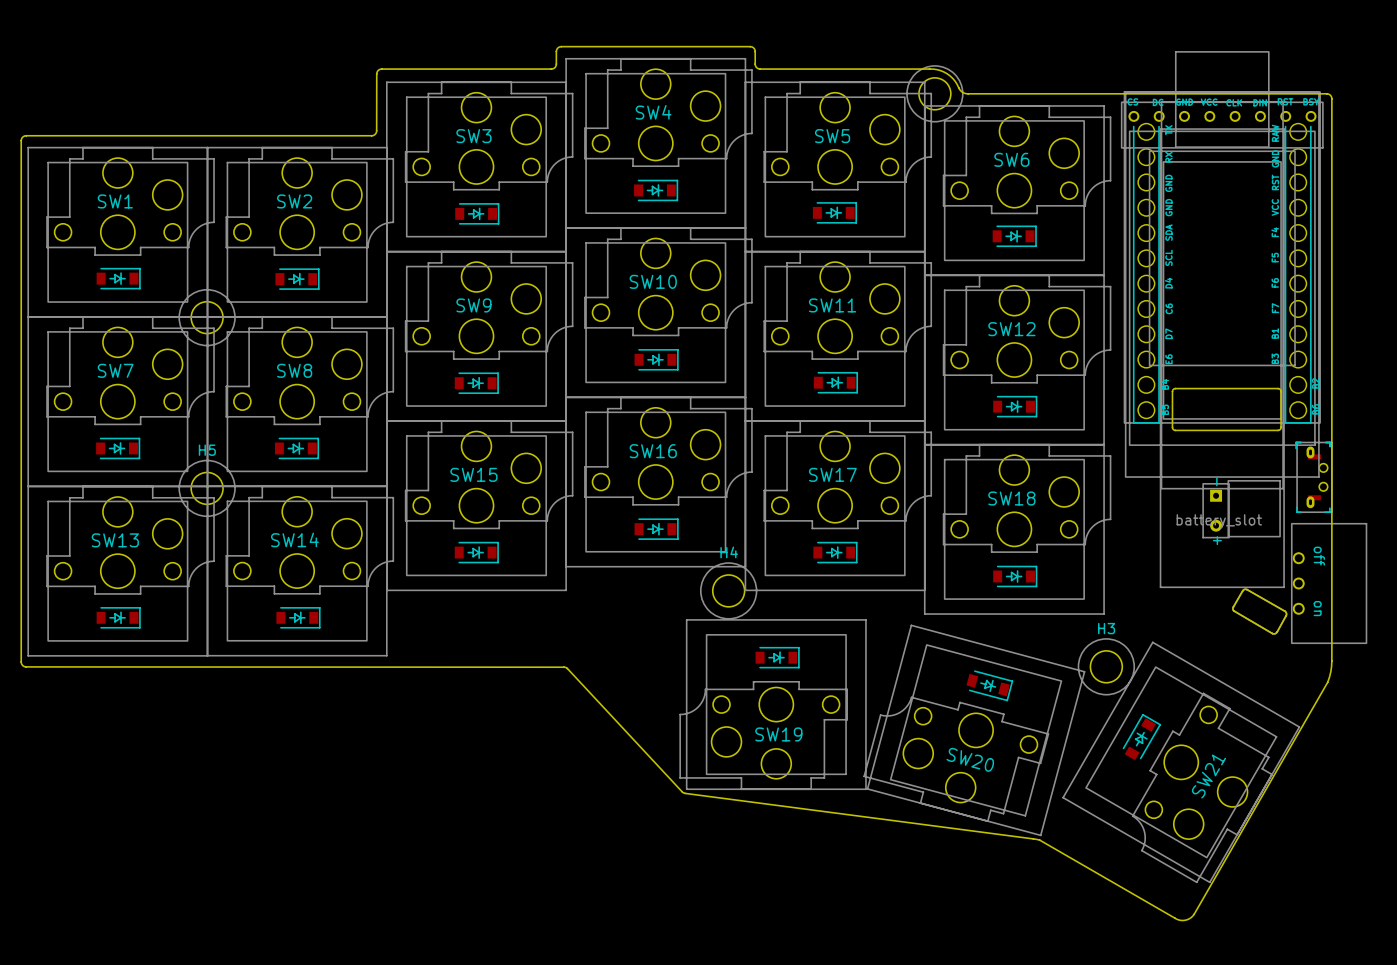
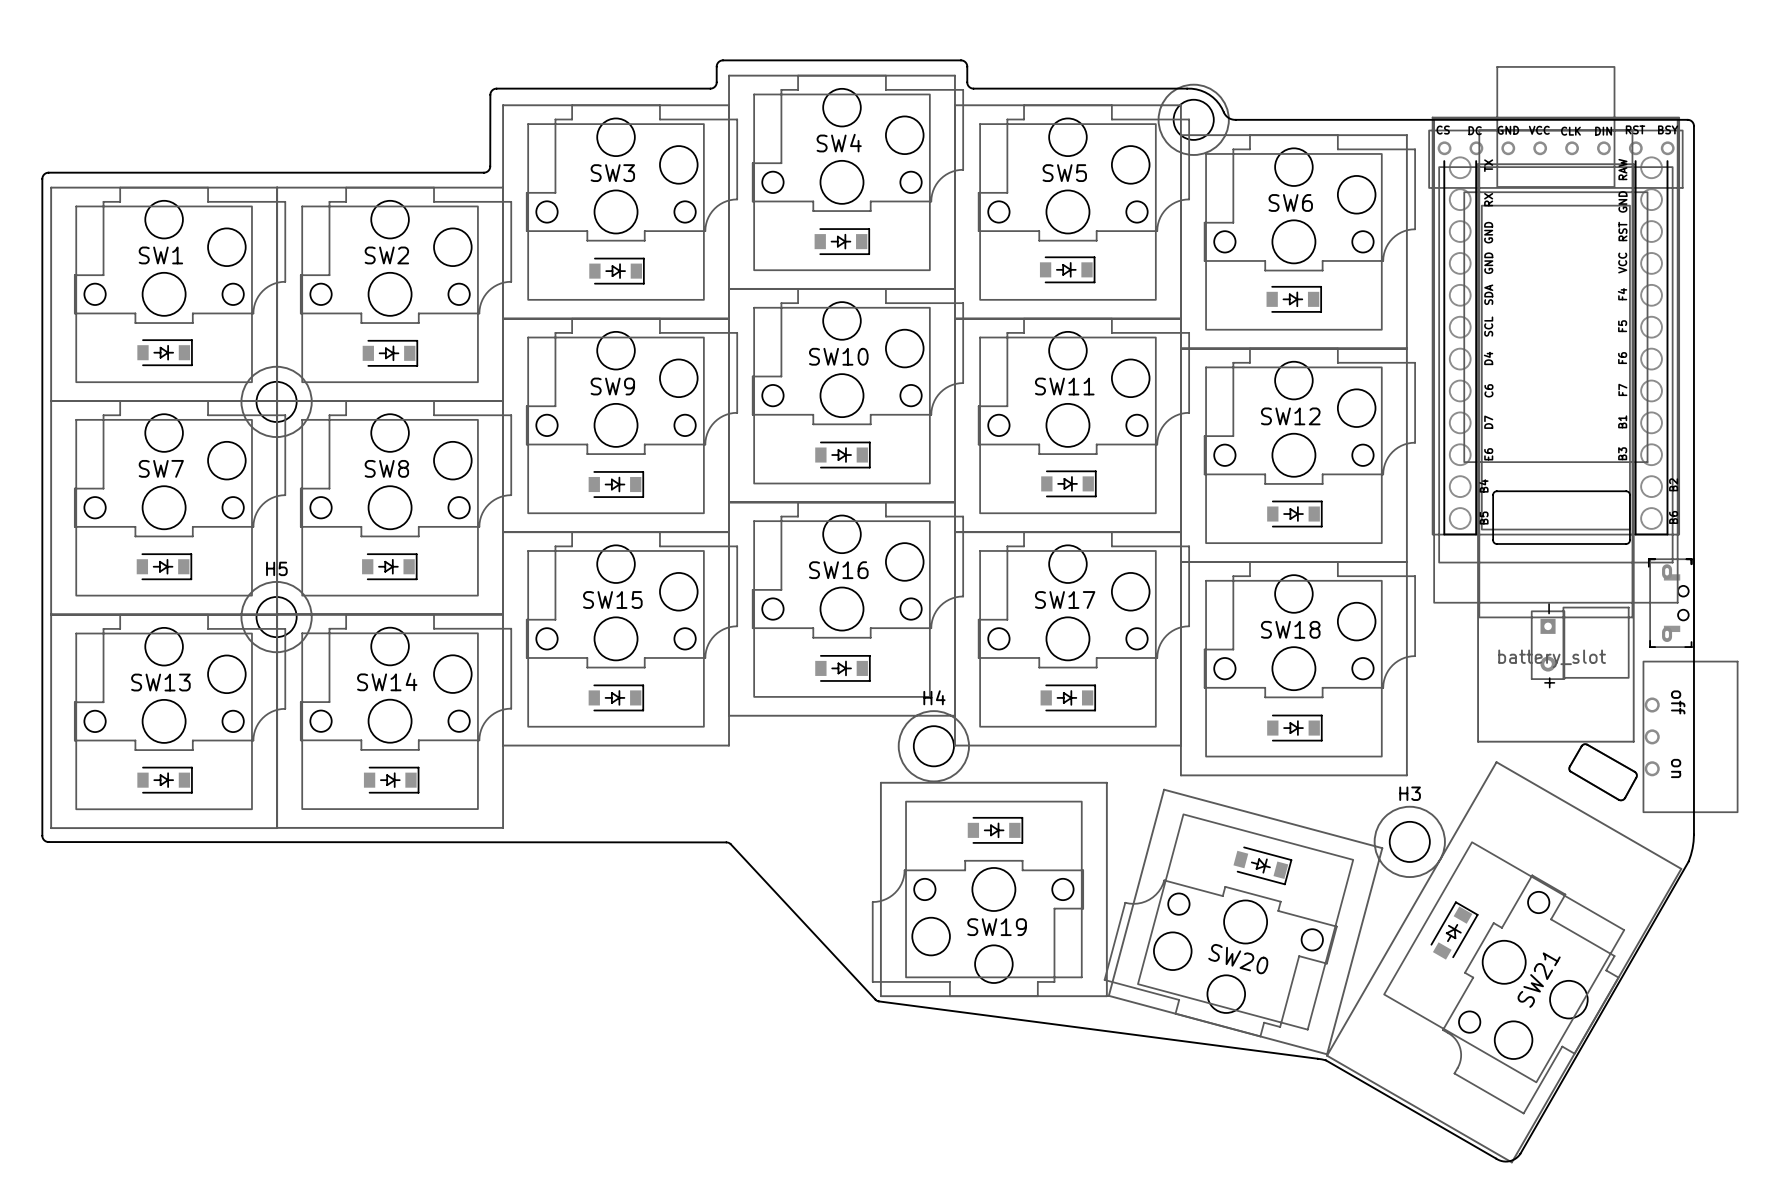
SW21 footprint: [1062, 641, 1301, 884] -> [1326, 761, 1683, 1164]

